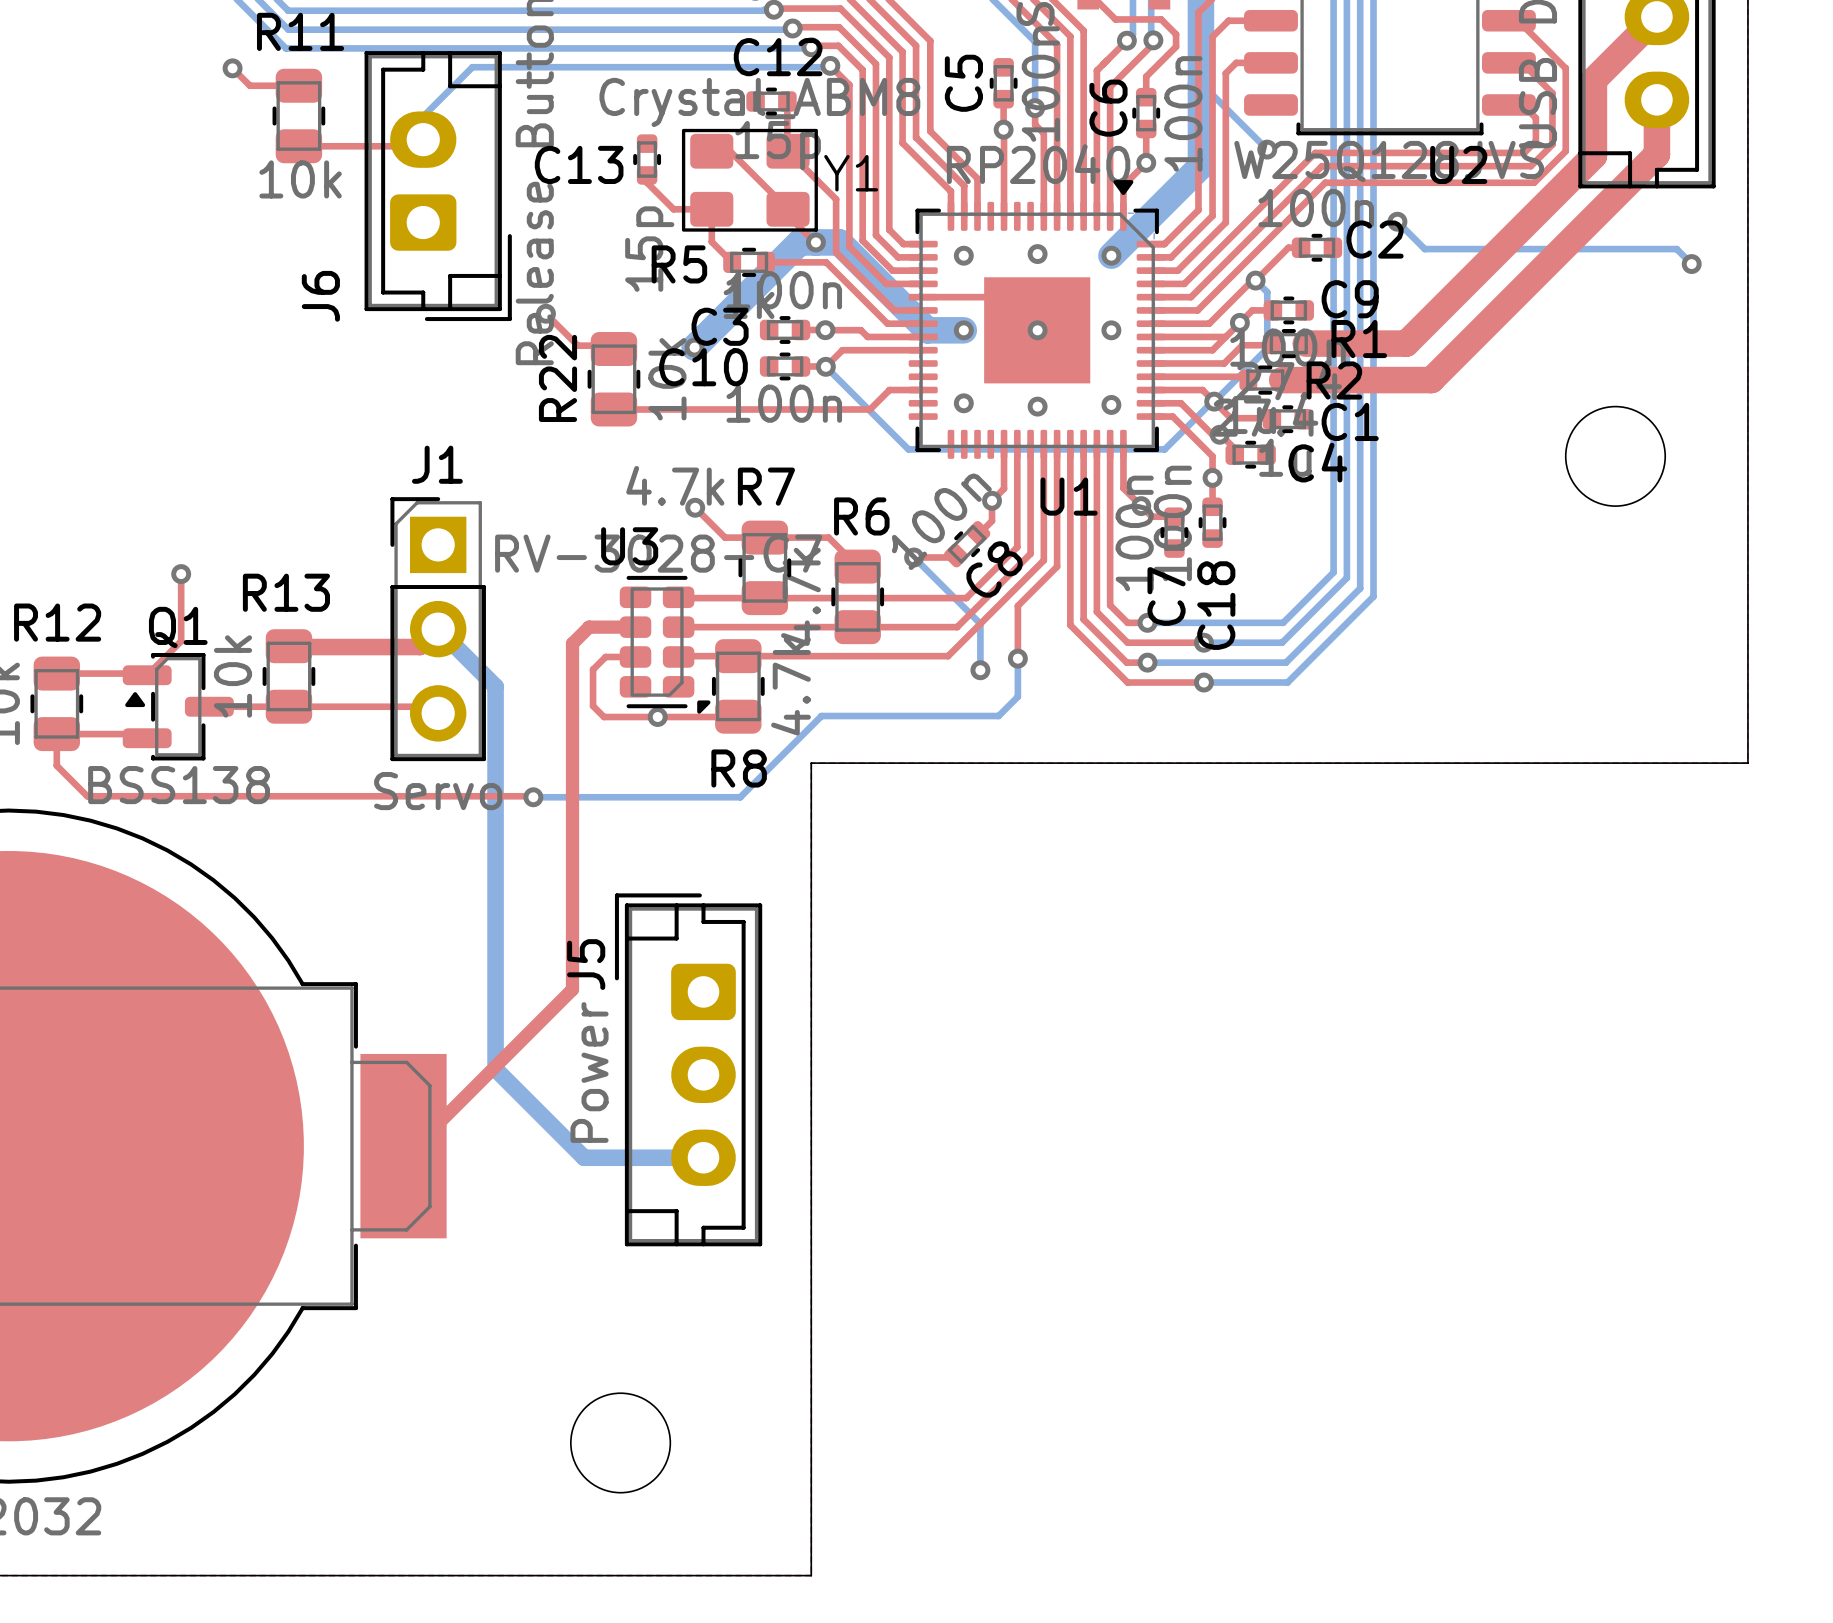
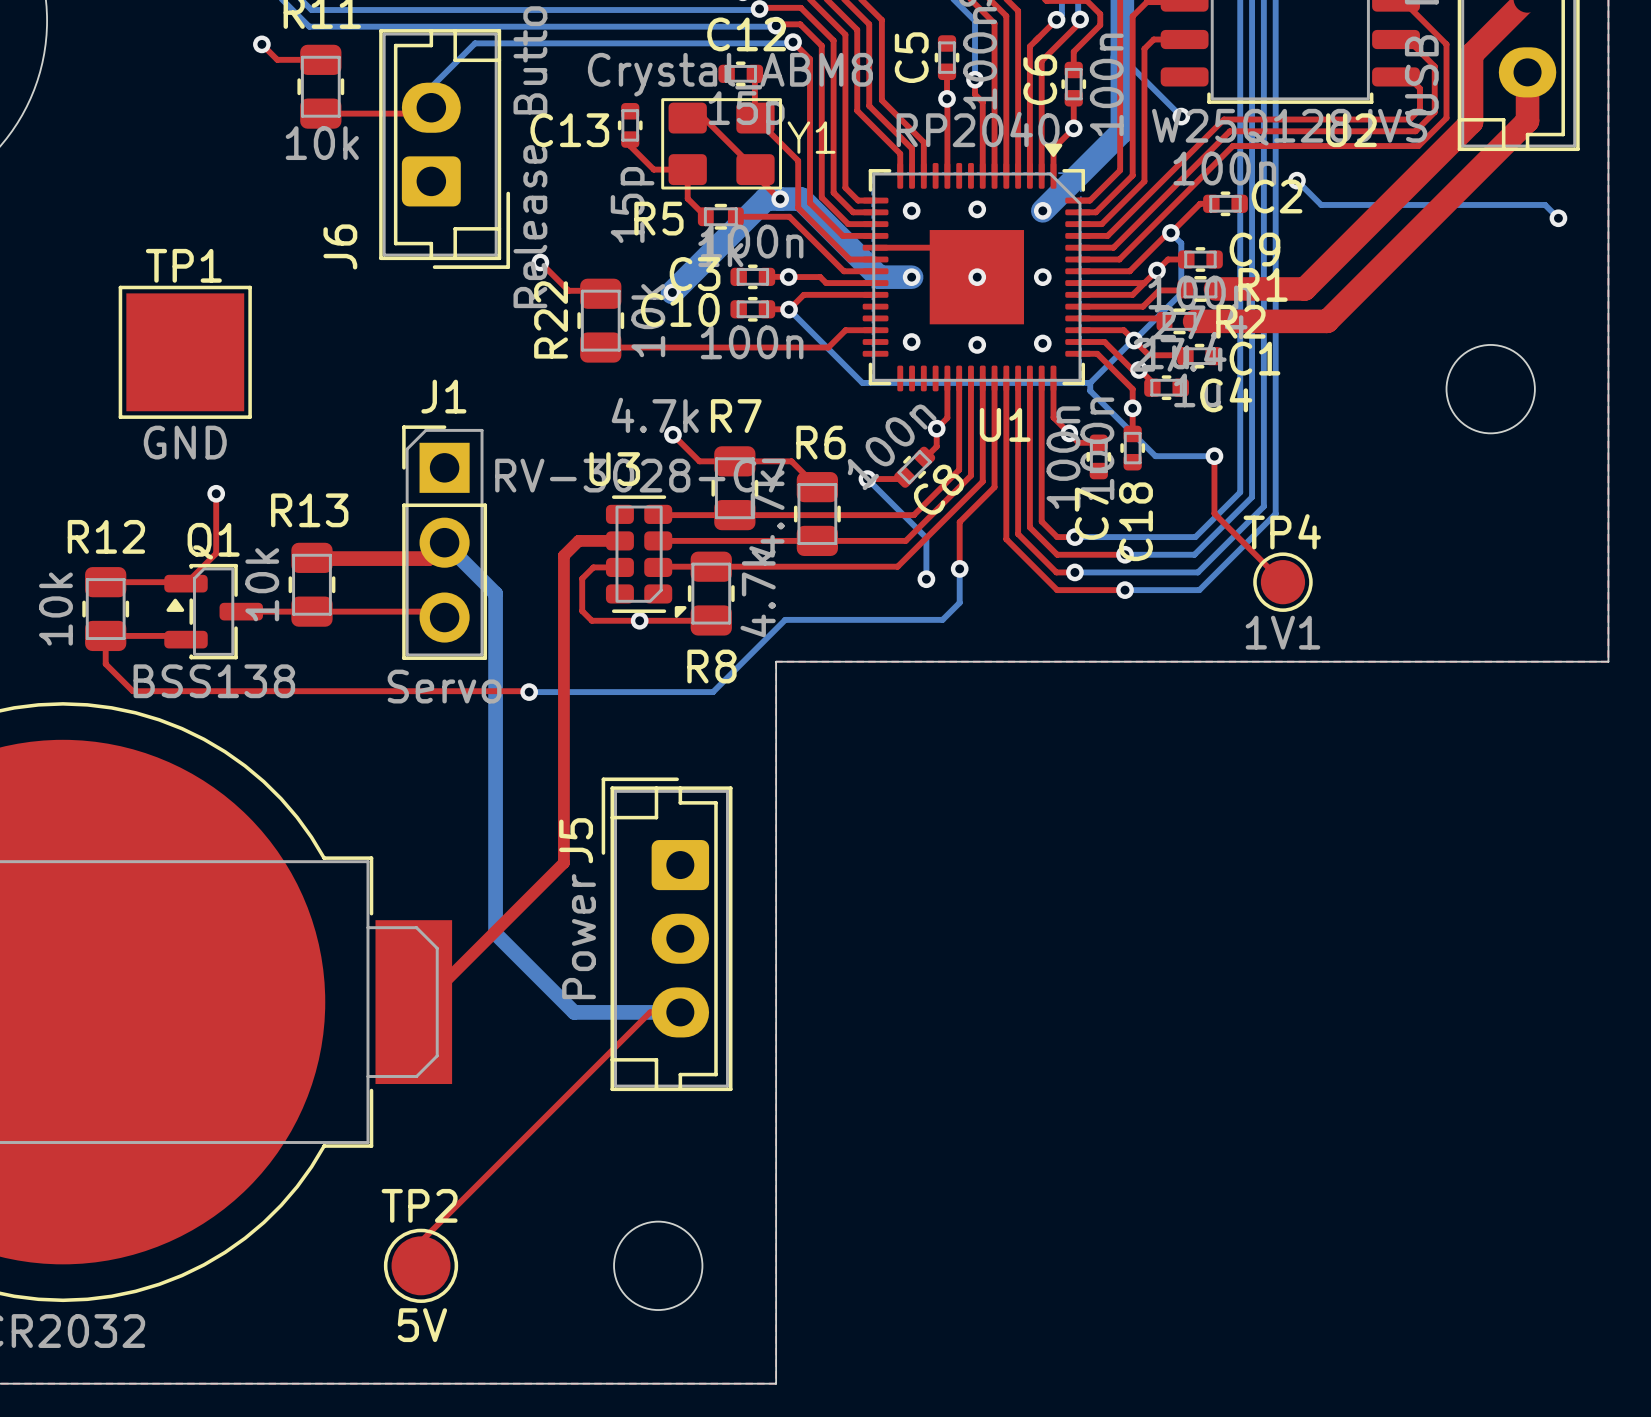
TP1: none -> GND (185, 352)
bottom track: none -> (1090, 382) (1090, 390) (1155, 456) (1214, 456)
top track: none -> (1214, 456) (1214, 513) (1282, 582)
via: none -> (1214, 456)
TP4: none -> 1V1 (1282, 582)
top track: none -> (680, 1012) (650, 1012) (421, 1241) (421, 1265)
TP2: none -> 5V (421, 1265)
round board edge position: (620, 1442) -> (658, 1265)

